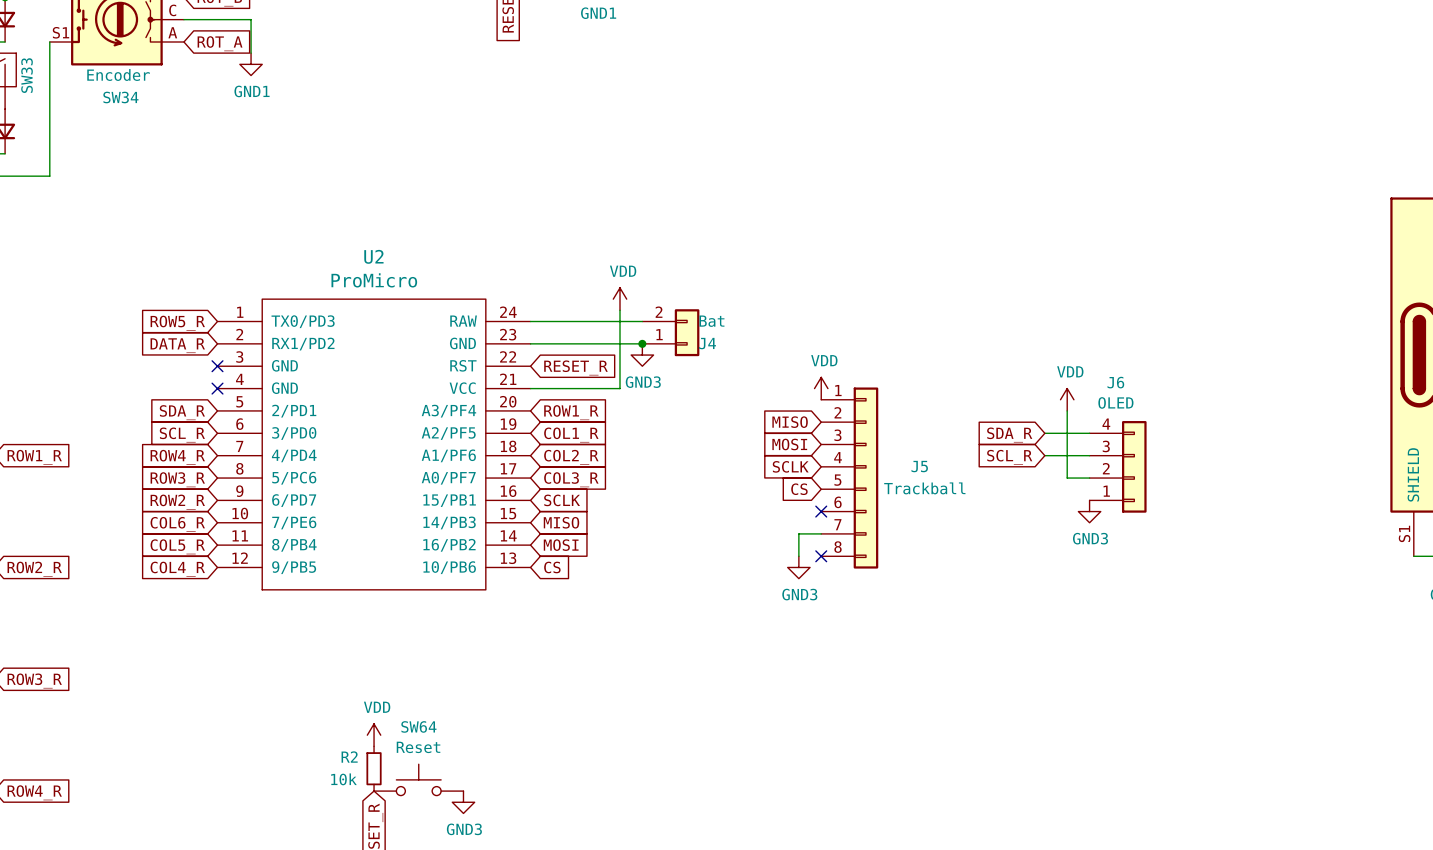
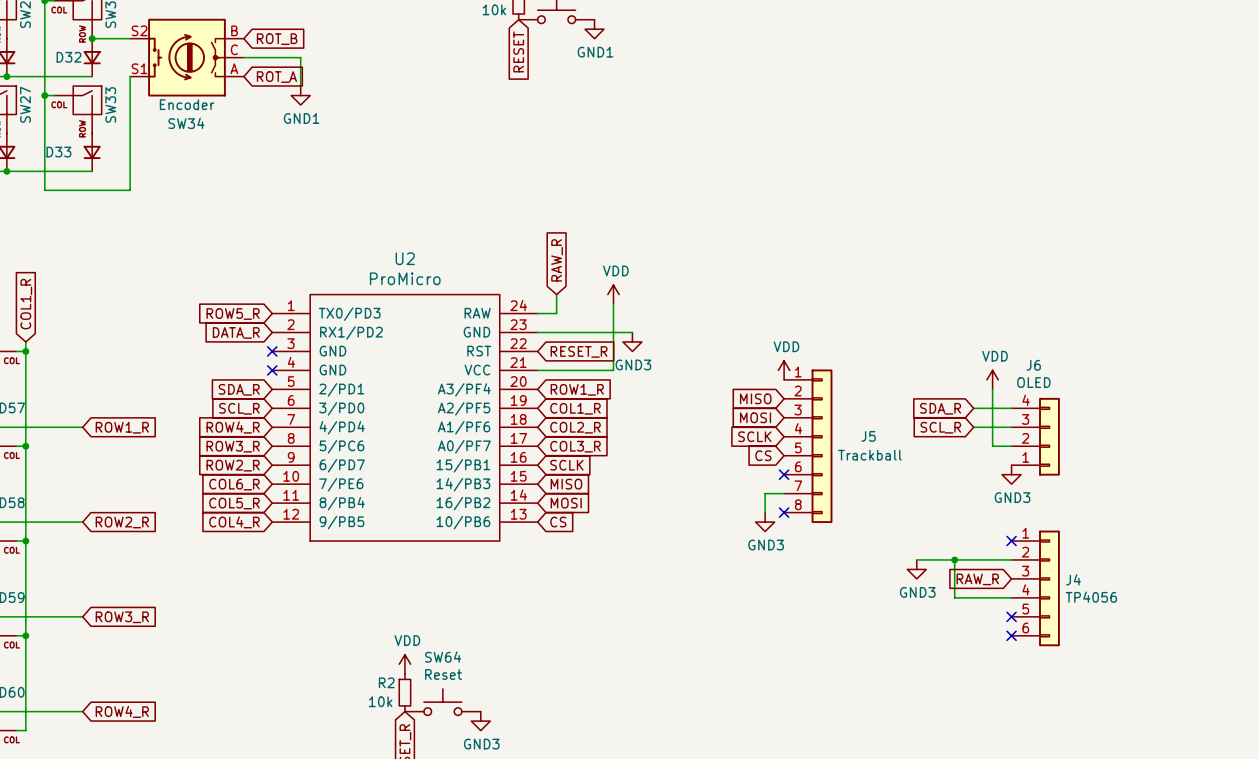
global label: none -> RAW_R (557, 260)
J4 symbol: [642, 309, 700, 357] -> [1011, 530, 1060, 647]
wire: (552, 321) (642, 321) -> (556, 313) (556, 294)
J4 value: Bat (711, 321) -> TP4056 (1091, 597)
junction: (642, 343) -> none
J4 name position: J4 (707, 343) -> J4 (1073, 579)
no-connect mark: none -> (1011, 541)
wire: none -> (916, 559) (1011, 559)
wire: none -> (954, 559) (954, 597) (1011, 597)
junction: none -> (954, 559)
power symbol: none -> GND3 (916, 569)
global label: none -> RAW_R (977, 579)
no-connect mark: none -> (1011, 616)
no-connect mark: none -> (1011, 635)

